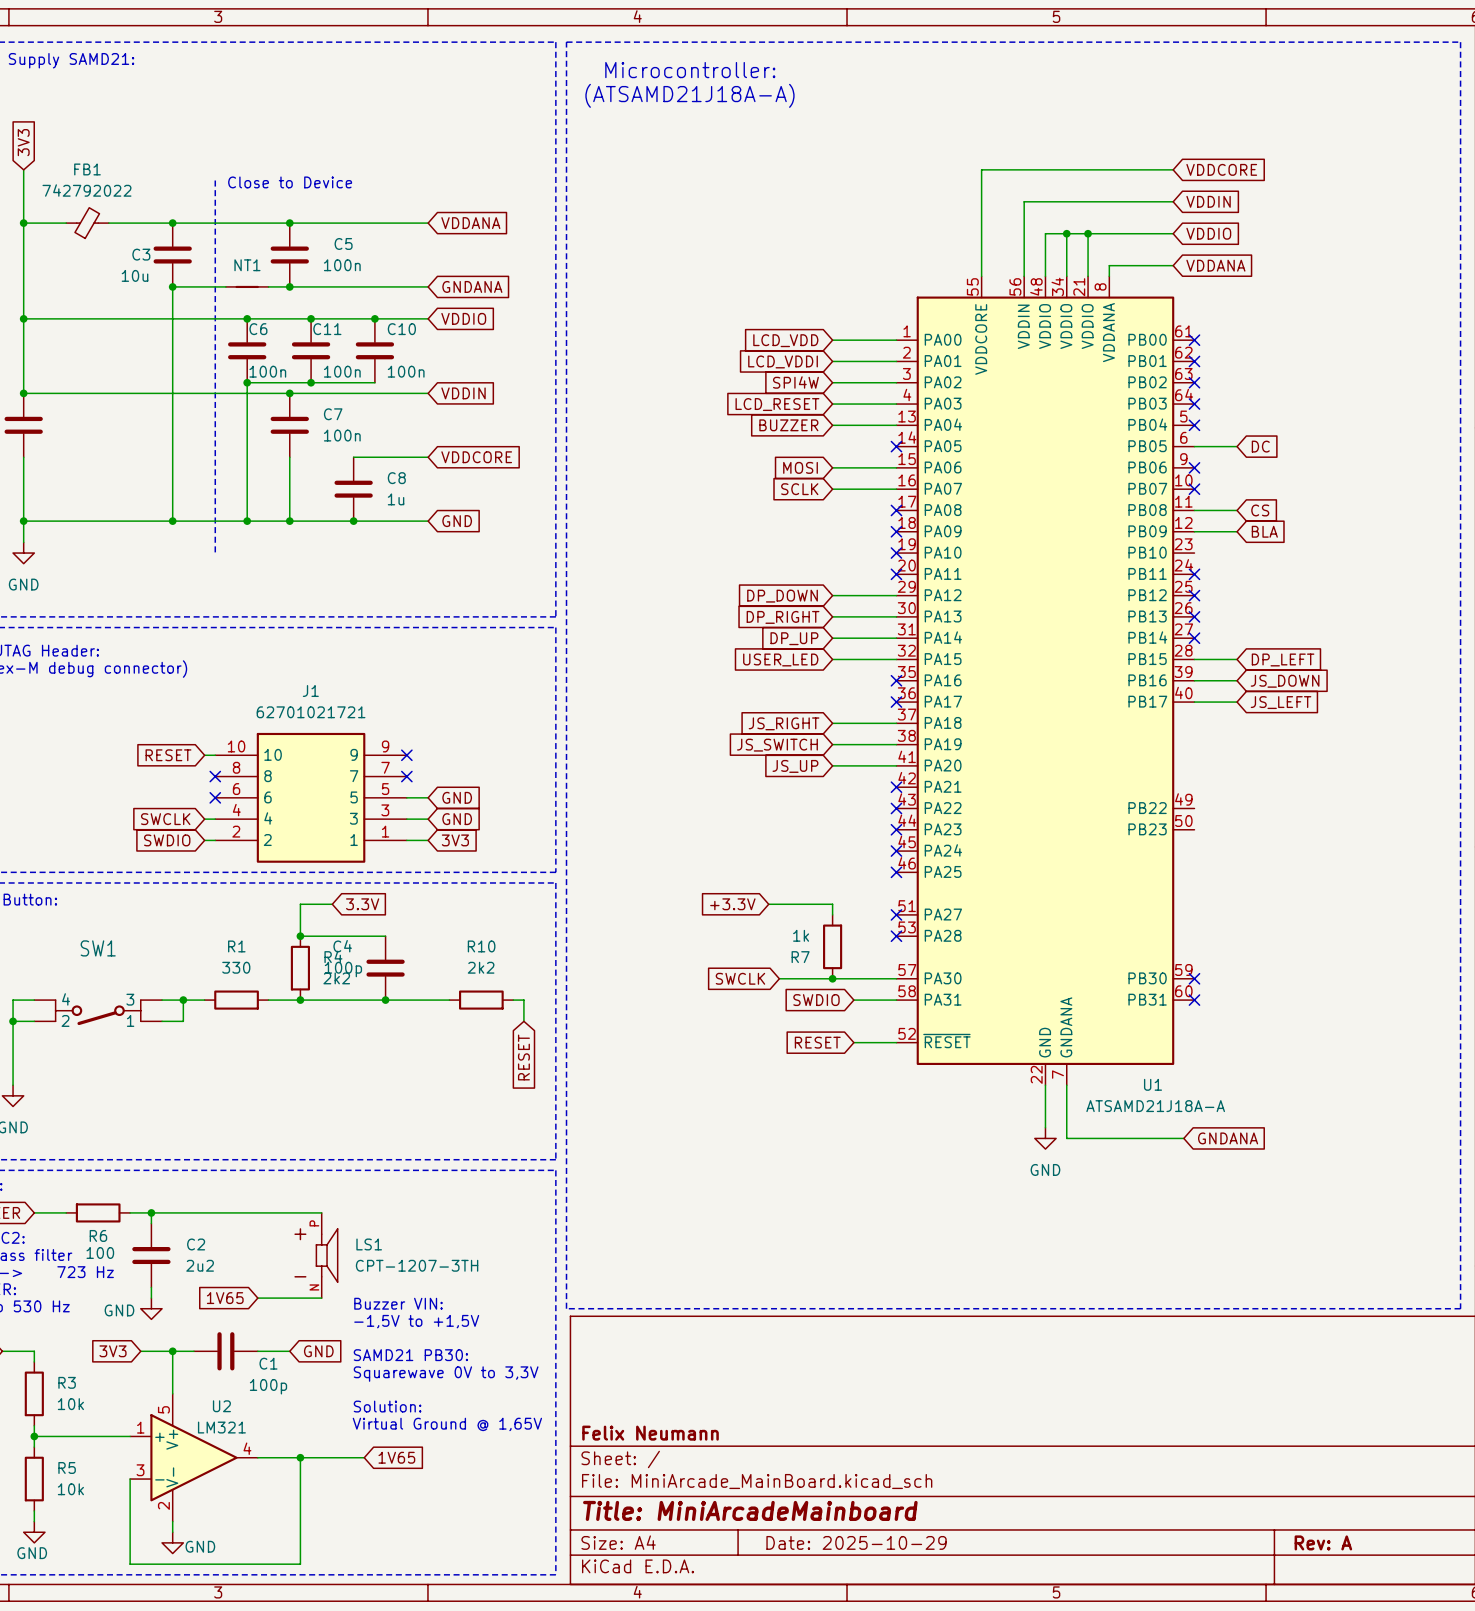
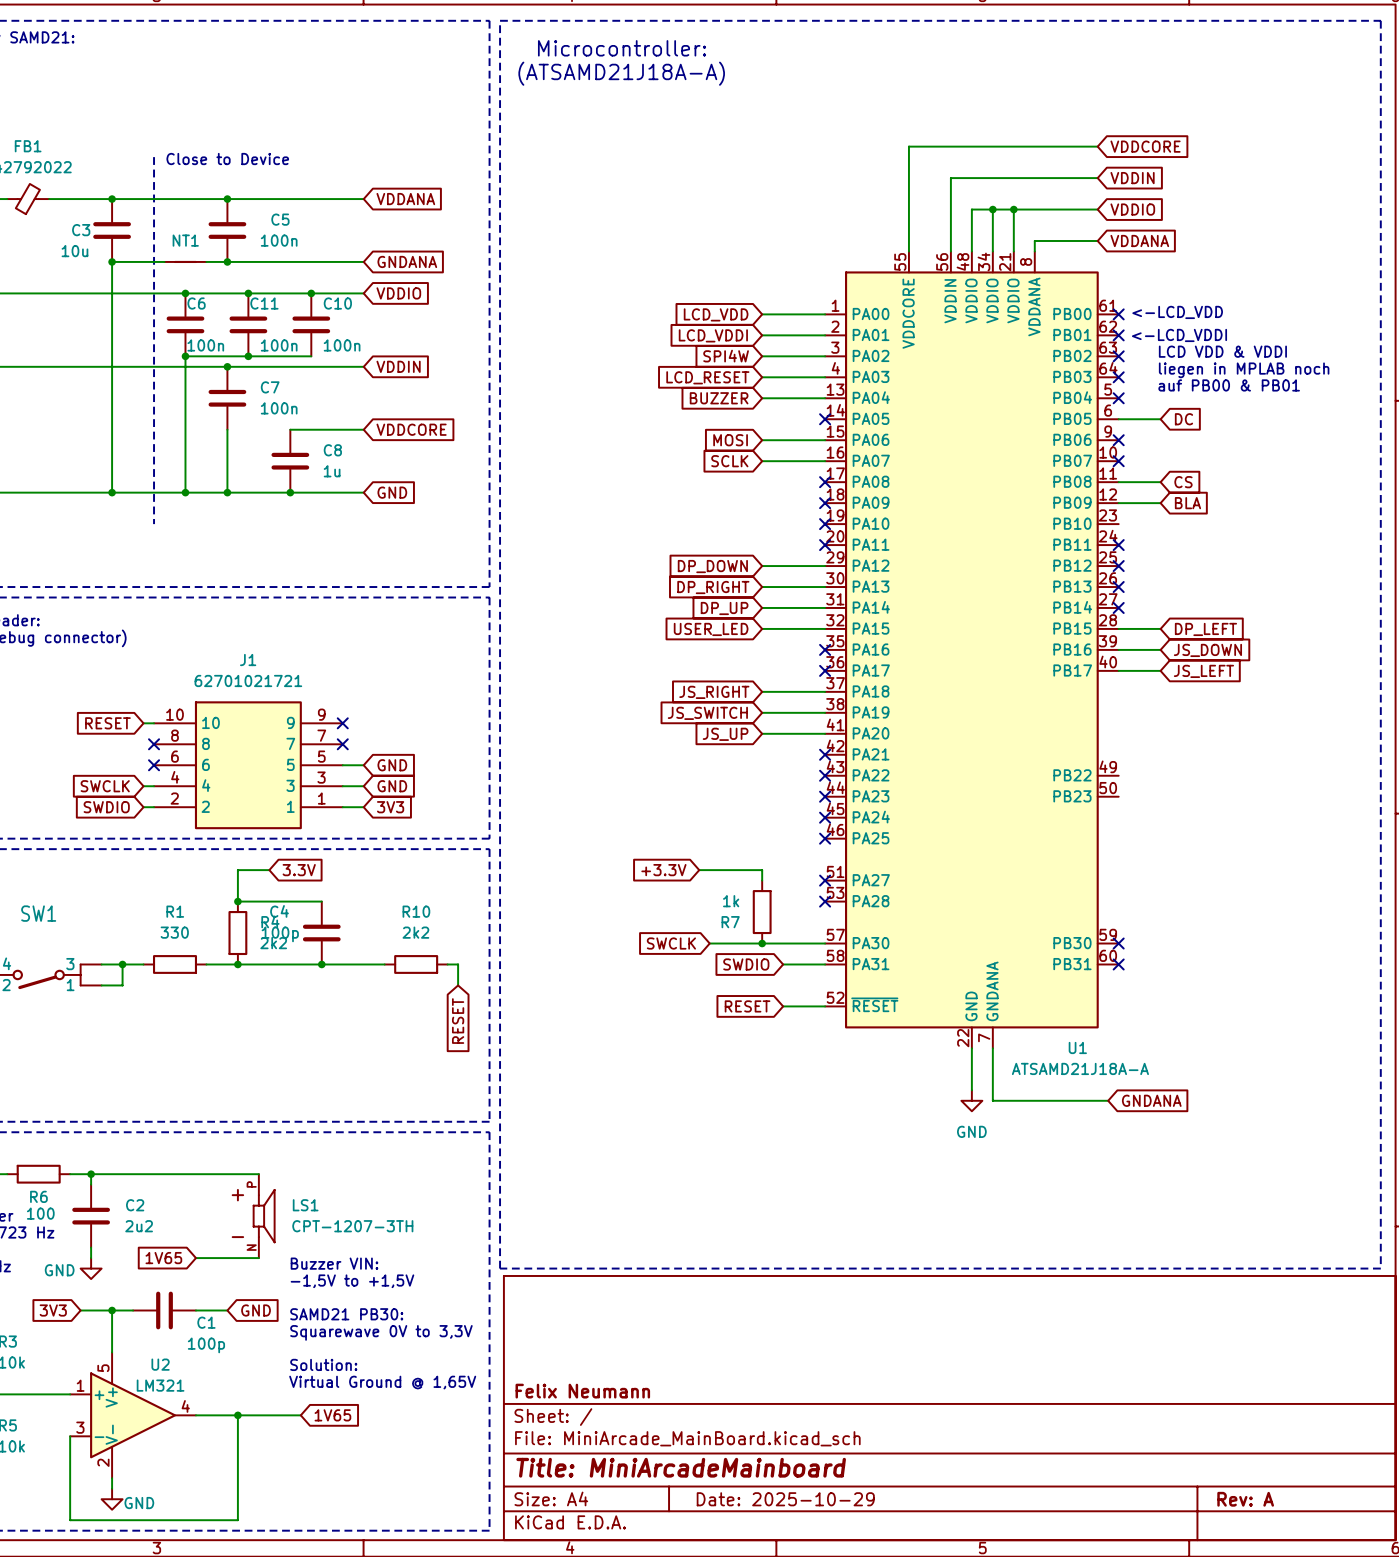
text: none -> <-LCD_VDD (1177, 312)
text: none -> <-LCD_VDDI (1179, 335)
text: none -> LCD VDD & VDDI (1222, 351)
text: none -> liegen in MPLAB noch (1244, 370)
text: none -> auf PB00 & PB01 (1229, 385)

